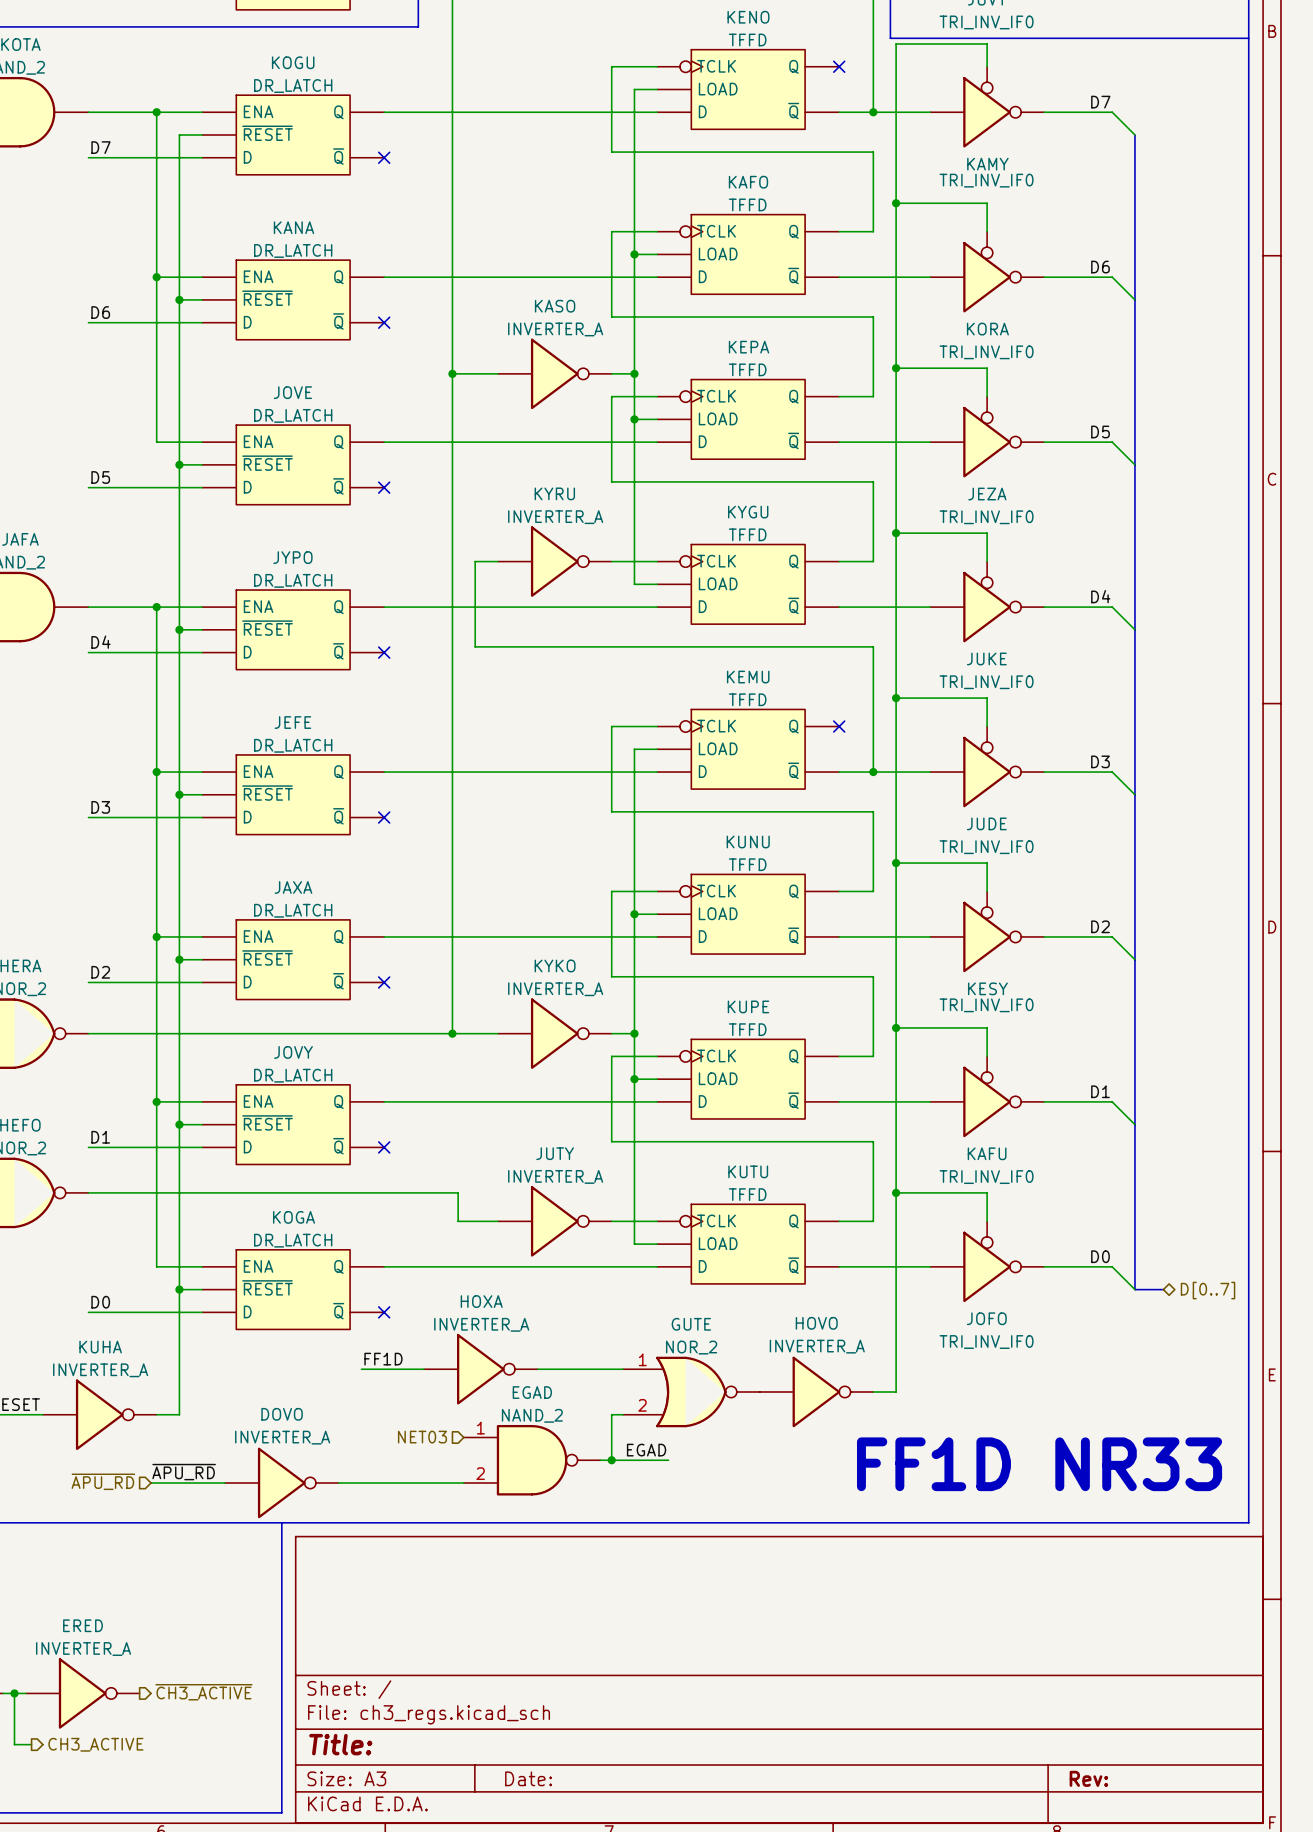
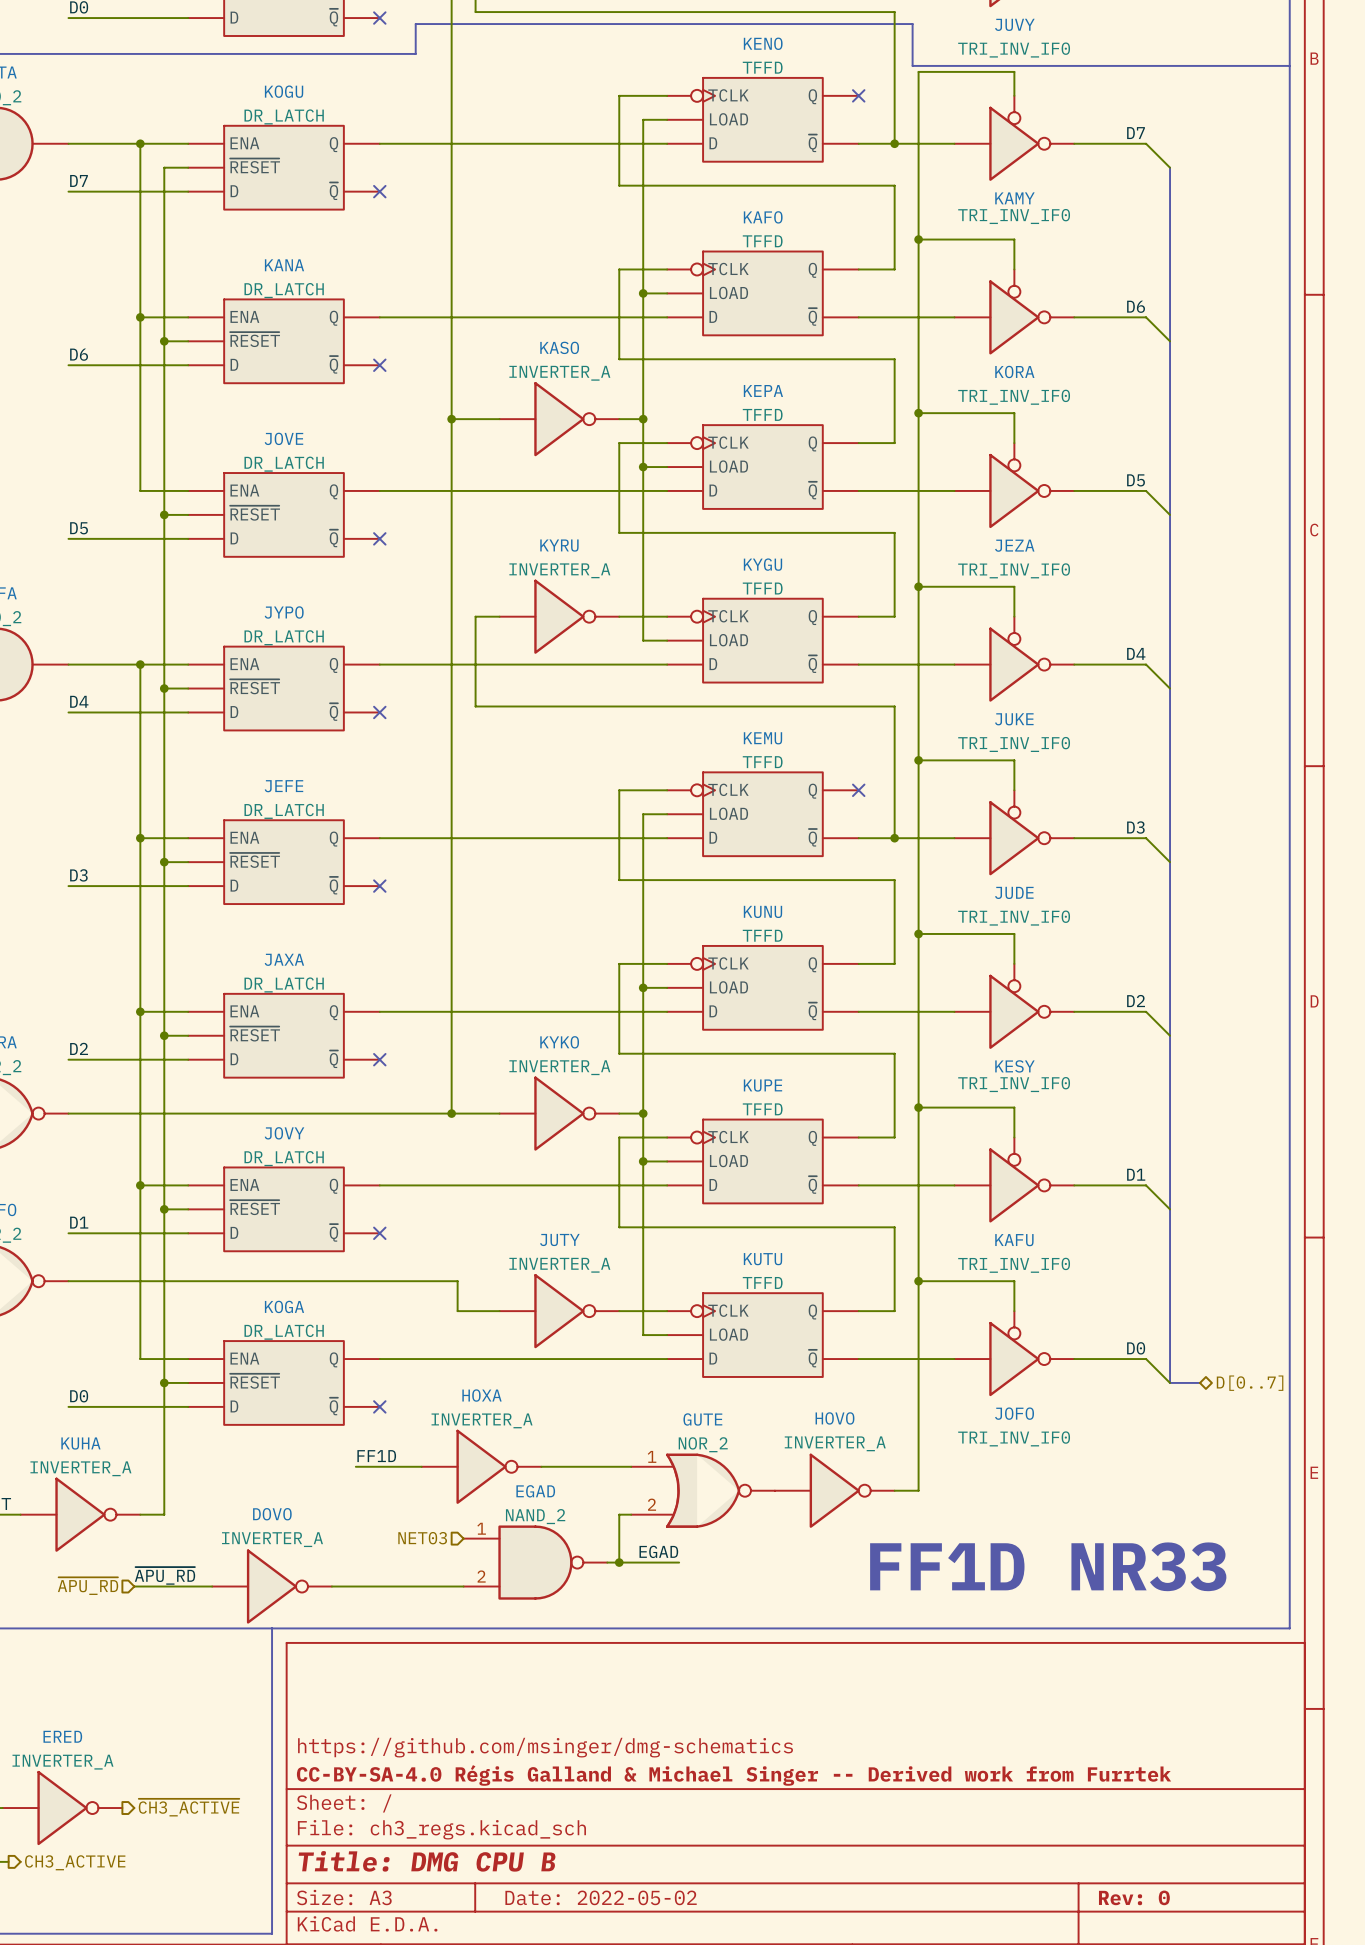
title block: none -> https://github.com/msinger/dmg-schematics (545, 1747)
title block: none -> CC-BY-SA-4.0 Régis Galland & Michael Singer -- Derived work from Furrtek (734, 1775)
title block: Title: (340, 1744) -> Title: DMG CPU B (427, 1861)
title block: Date: (528, 1778) -> Date: 2022-05-02 (601, 1897)
title block: Rev: (1088, 1778) -> Rev: 0 (1134, 1897)

